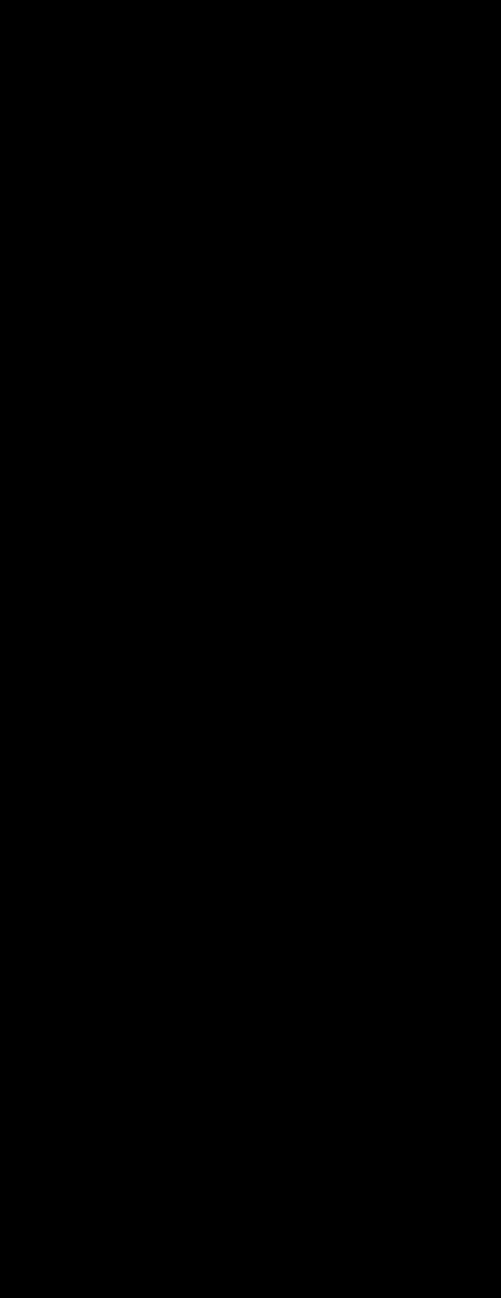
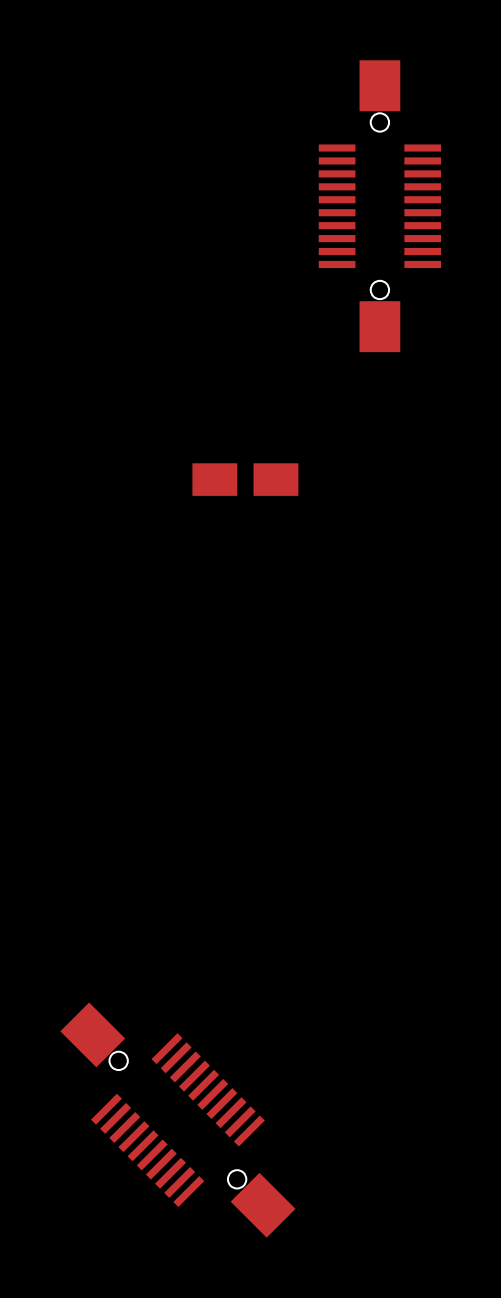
part: none -> (379, 206)
part: none -> (245, 479)
part: none -> (177, 1120)

